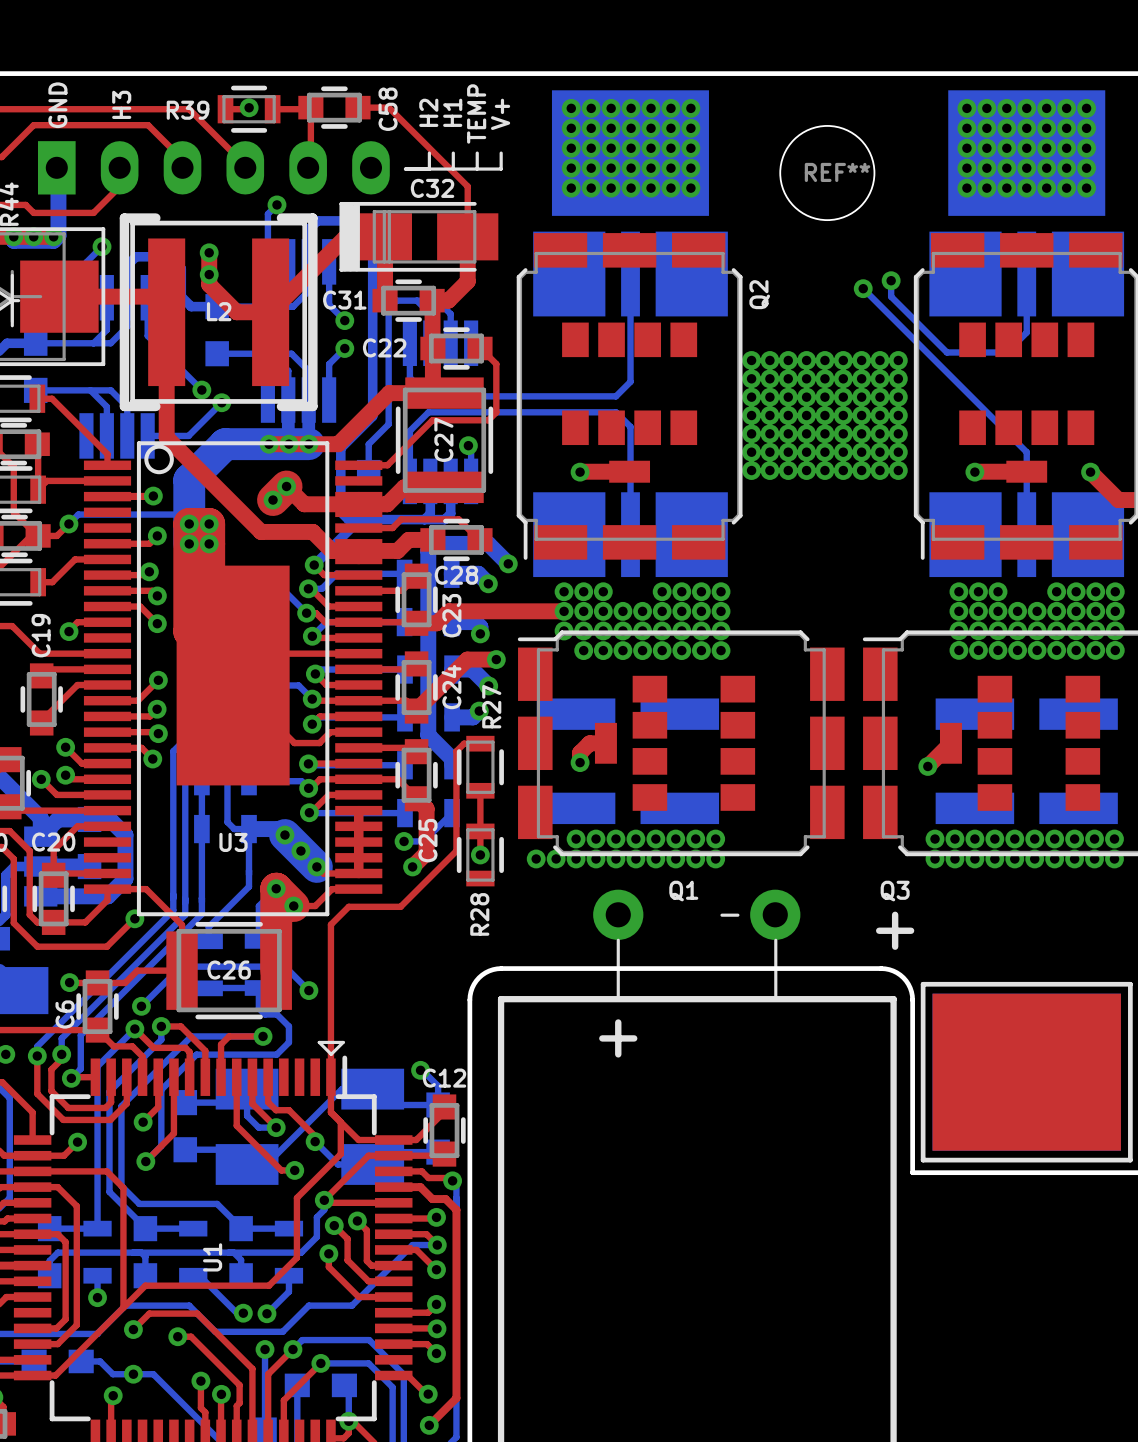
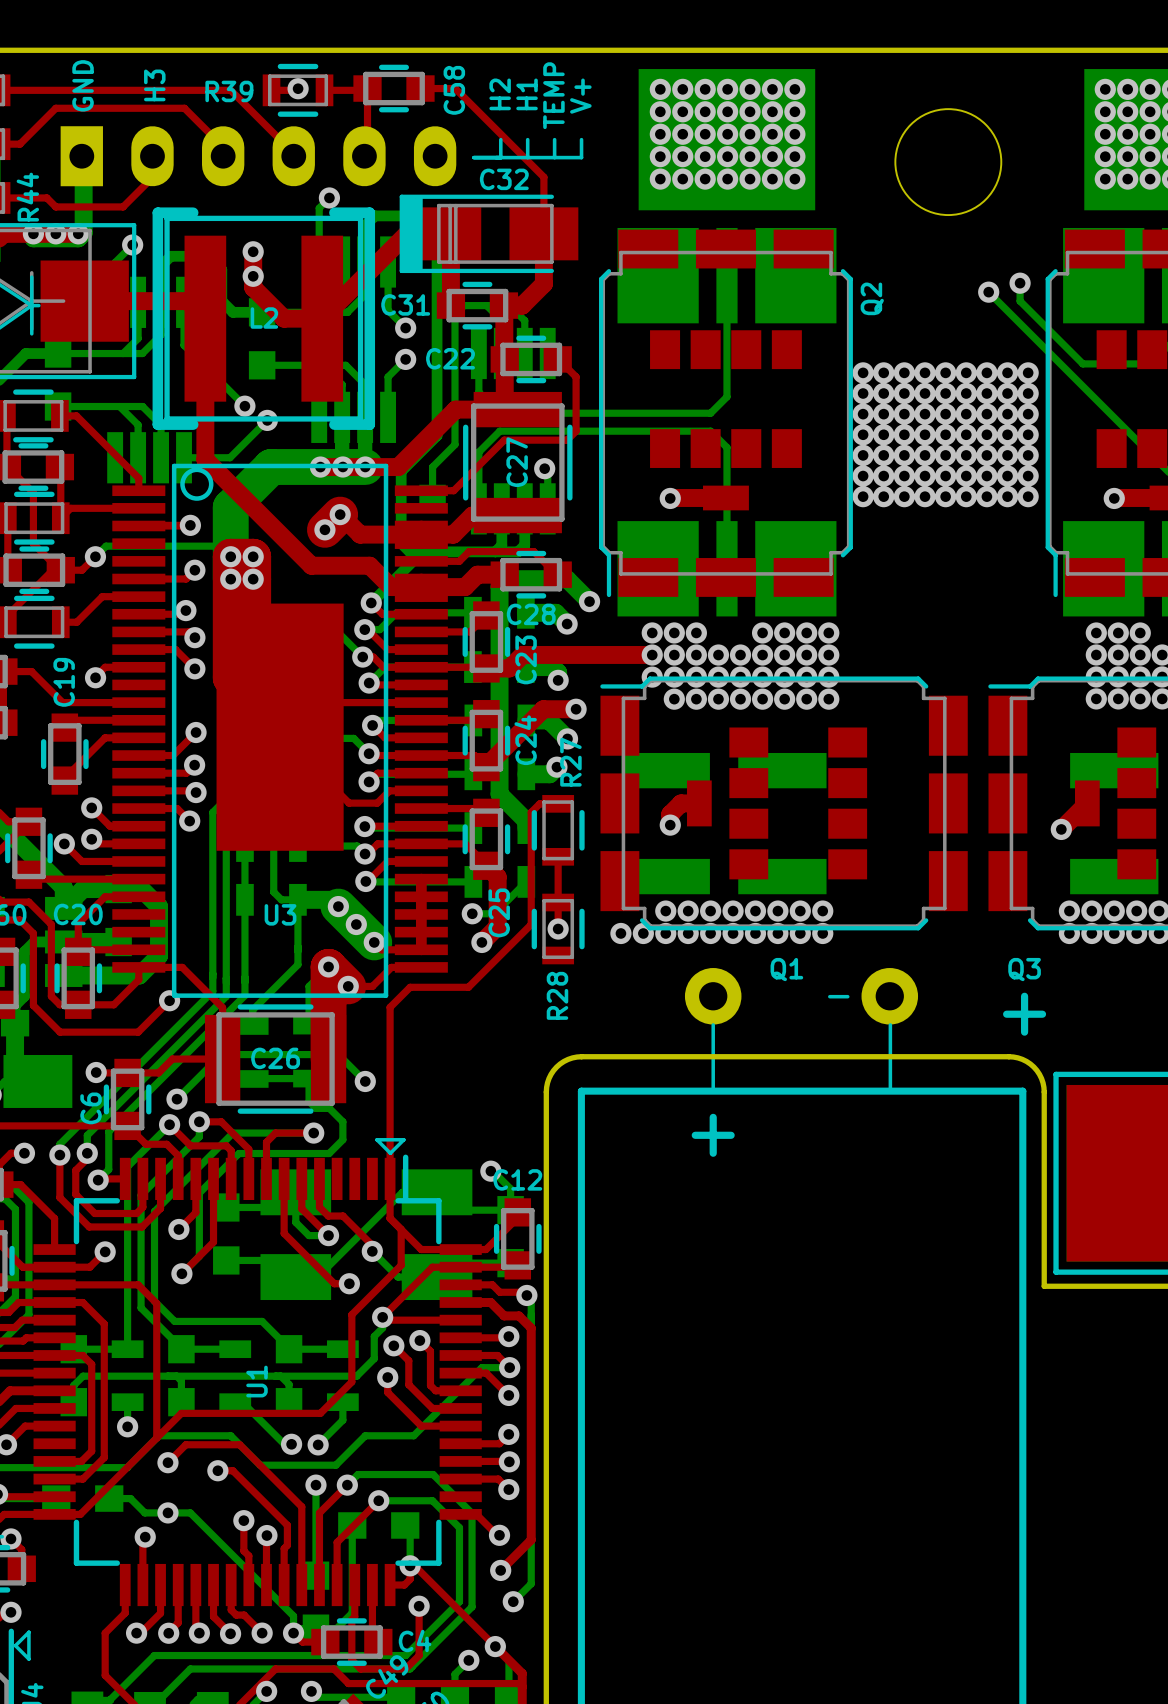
REF** name: REF** (837, 172) -> none

